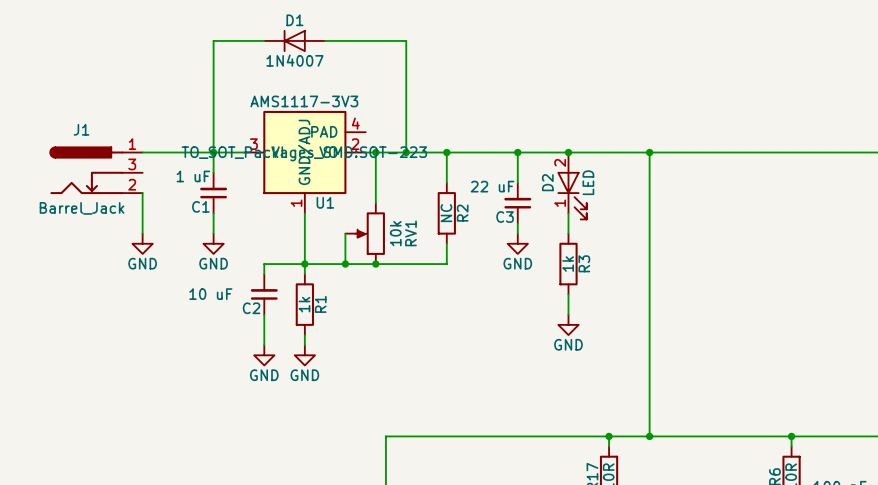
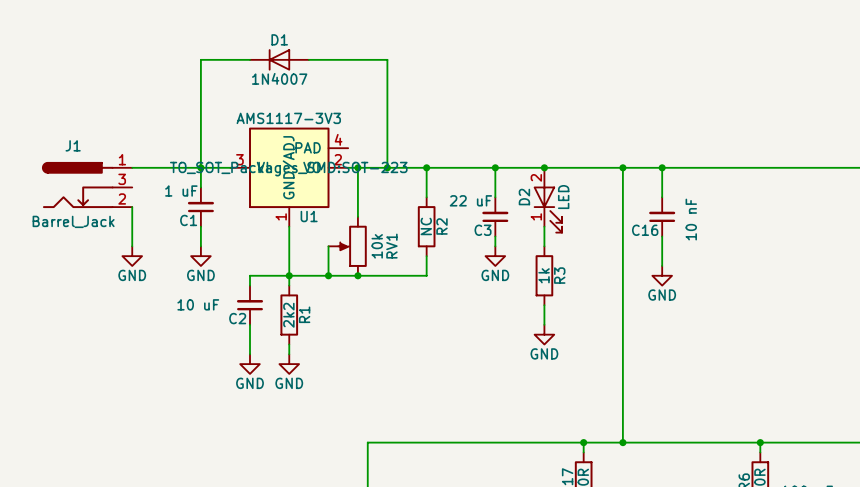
wire: none -> (662, 167) (662, 197)
junction: none -> (662, 167)
C16: none -> 10 nF (662, 216)
wire: none -> (662, 236) (662, 265)
power symbol: none -> GND (662, 275)
R1 value: 1k (304, 304) -> 2k2 (288, 315)

